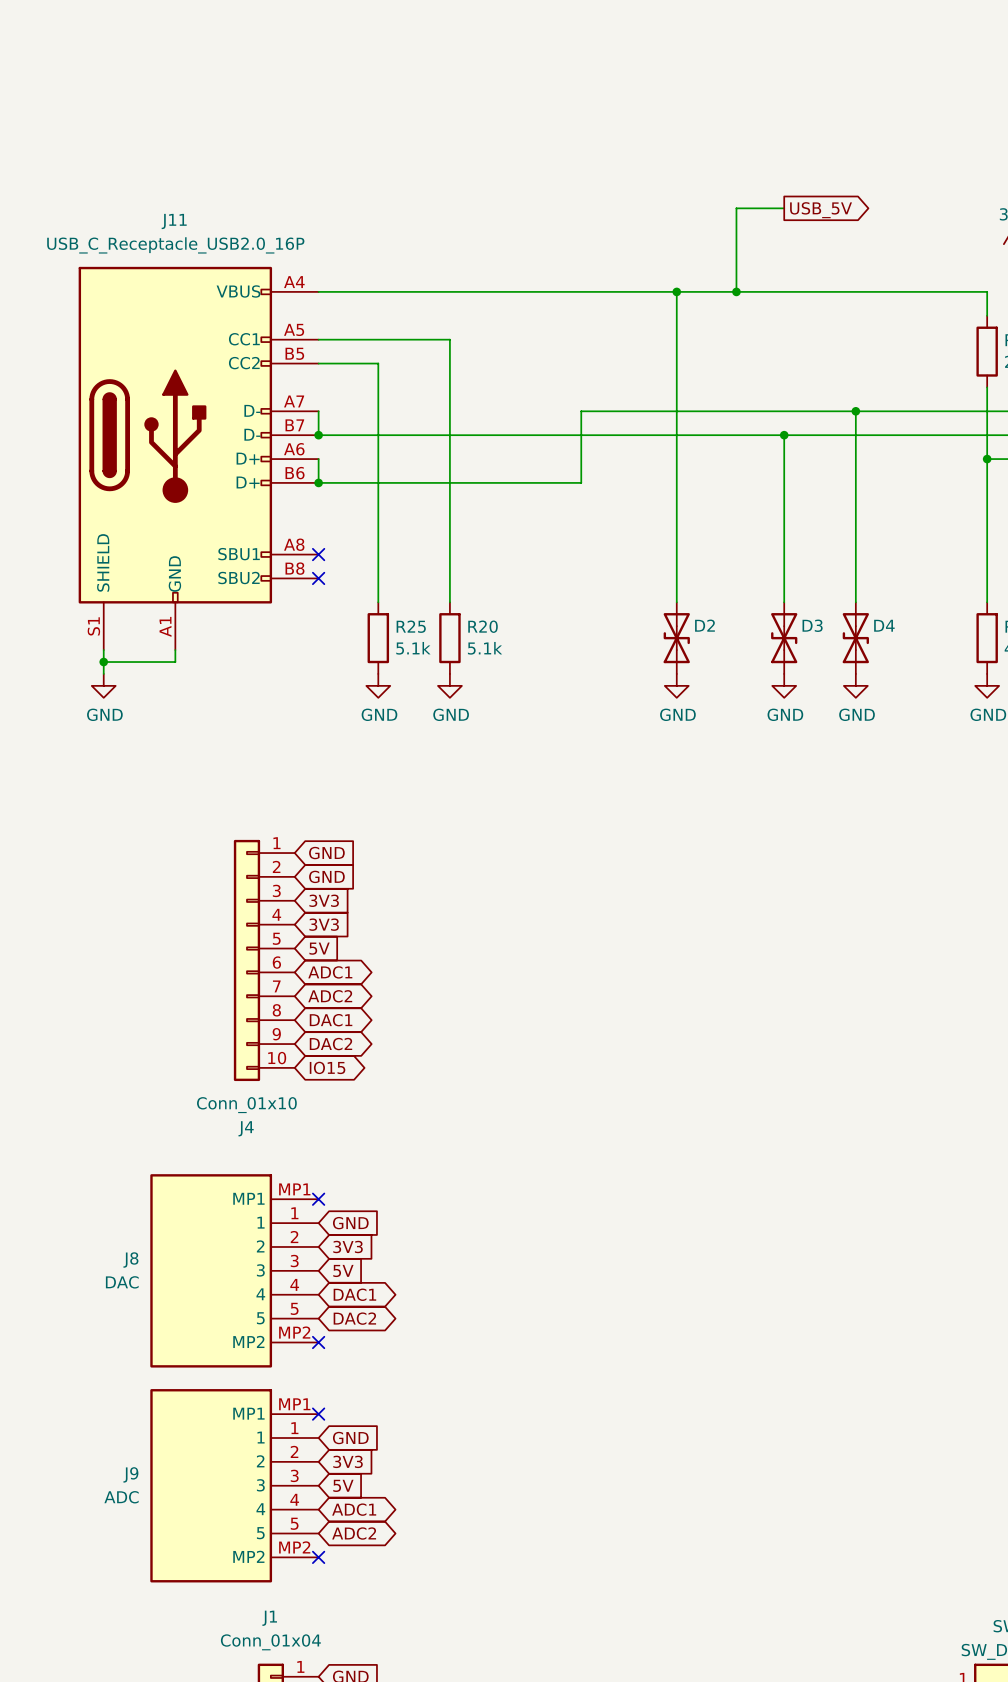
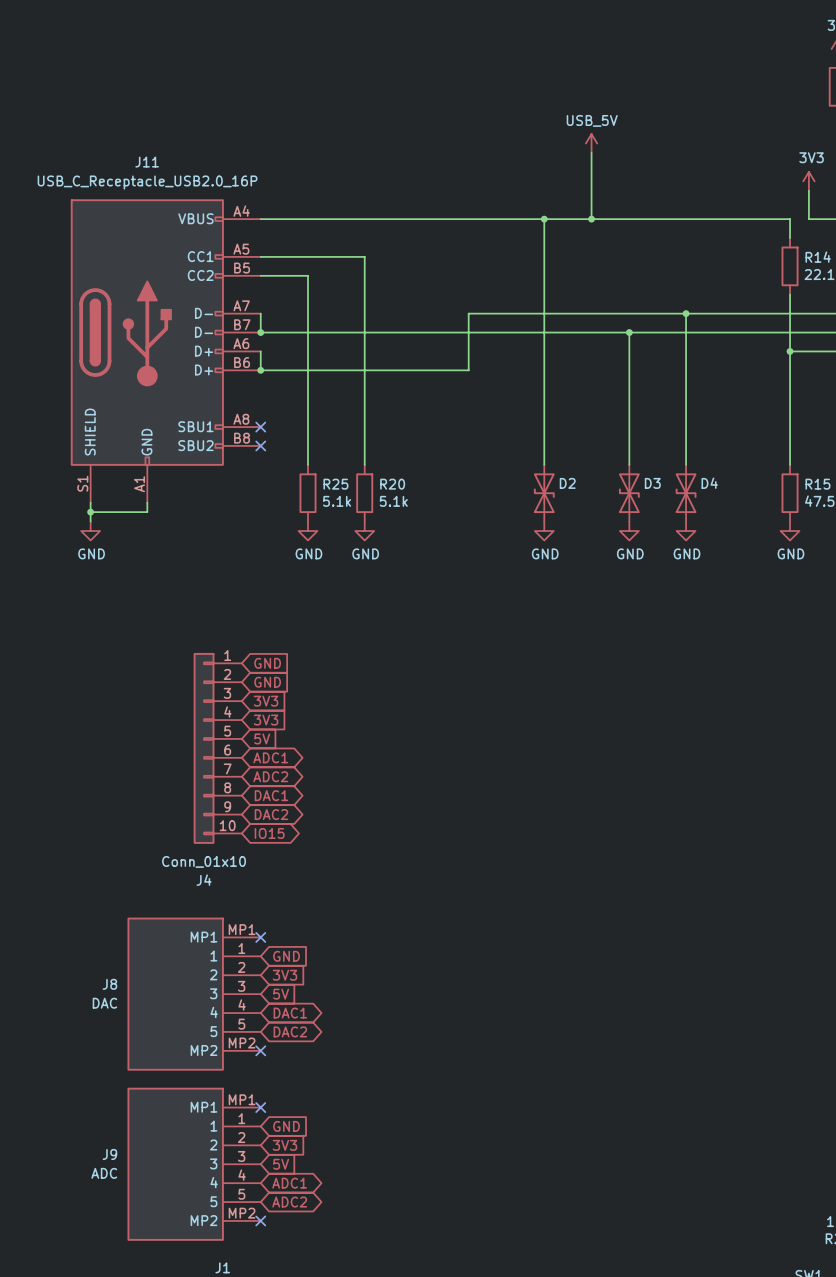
power symbol: none -> USB_5V (591, 143)
wire: (736, 208) (784, 208) -> none
global label: USB_5V (821, 210) -> none

